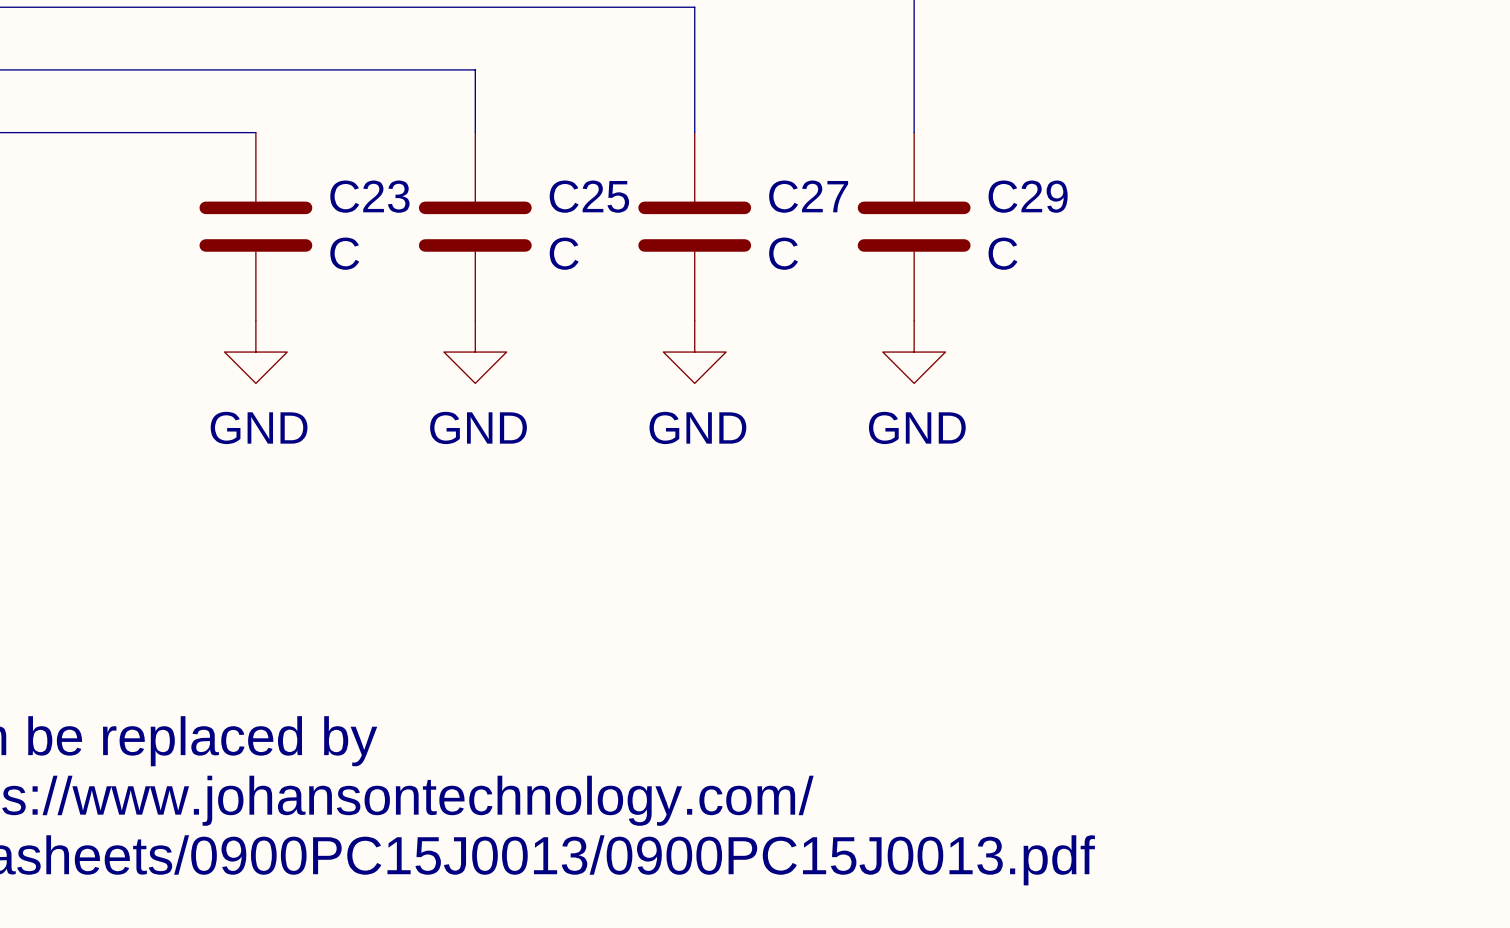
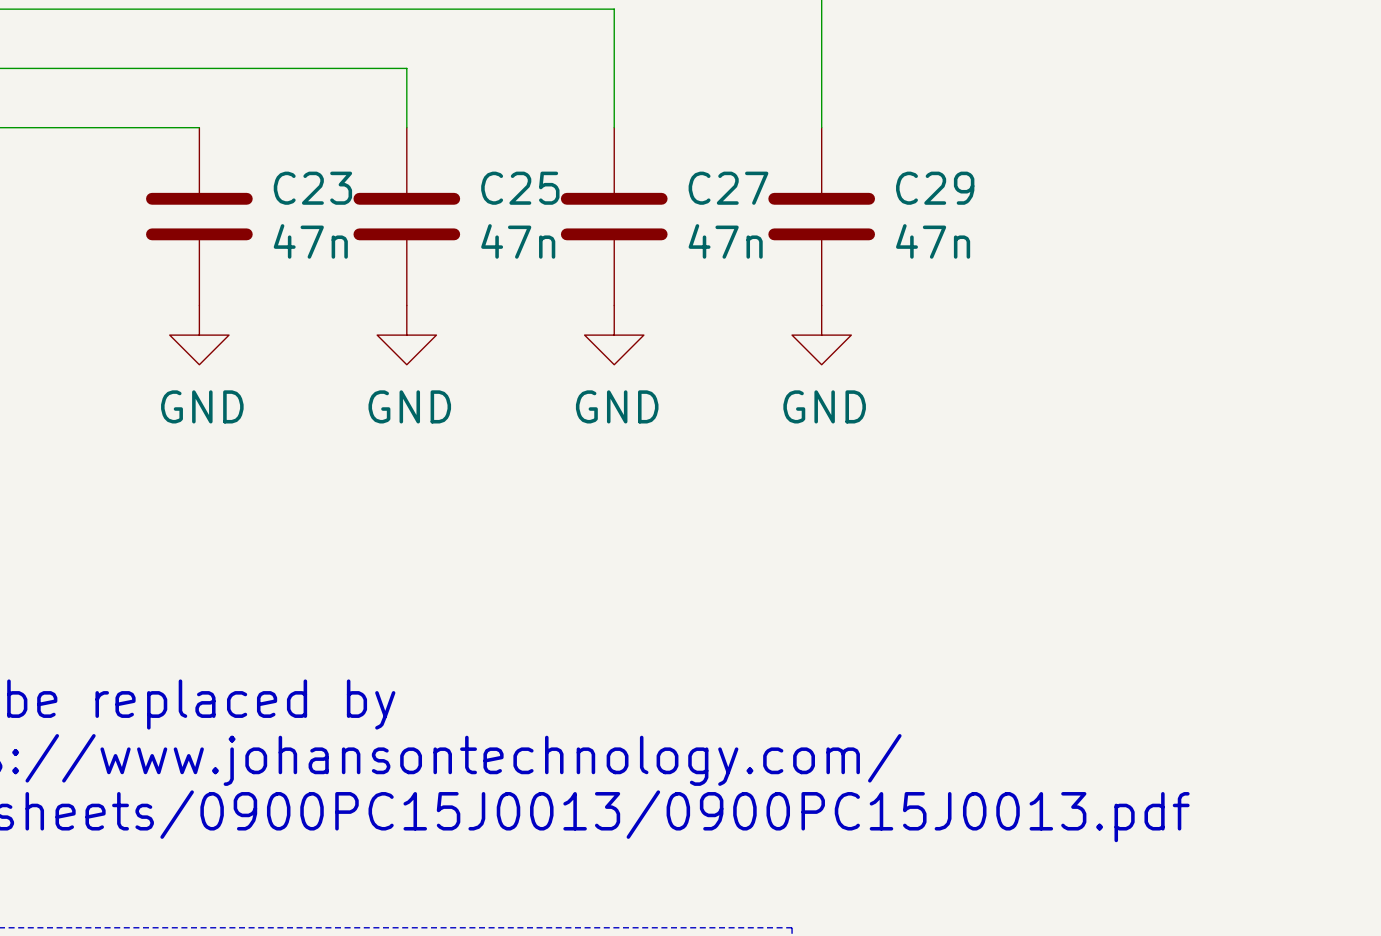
C23 value: C (344, 253) -> 47n (310, 241)
C25 value: C (564, 253) -> 47n (518, 241)
C27 value: C (783, 253) -> 47n (725, 241)
C29 value: C (1002, 253) -> 47n (933, 241)

